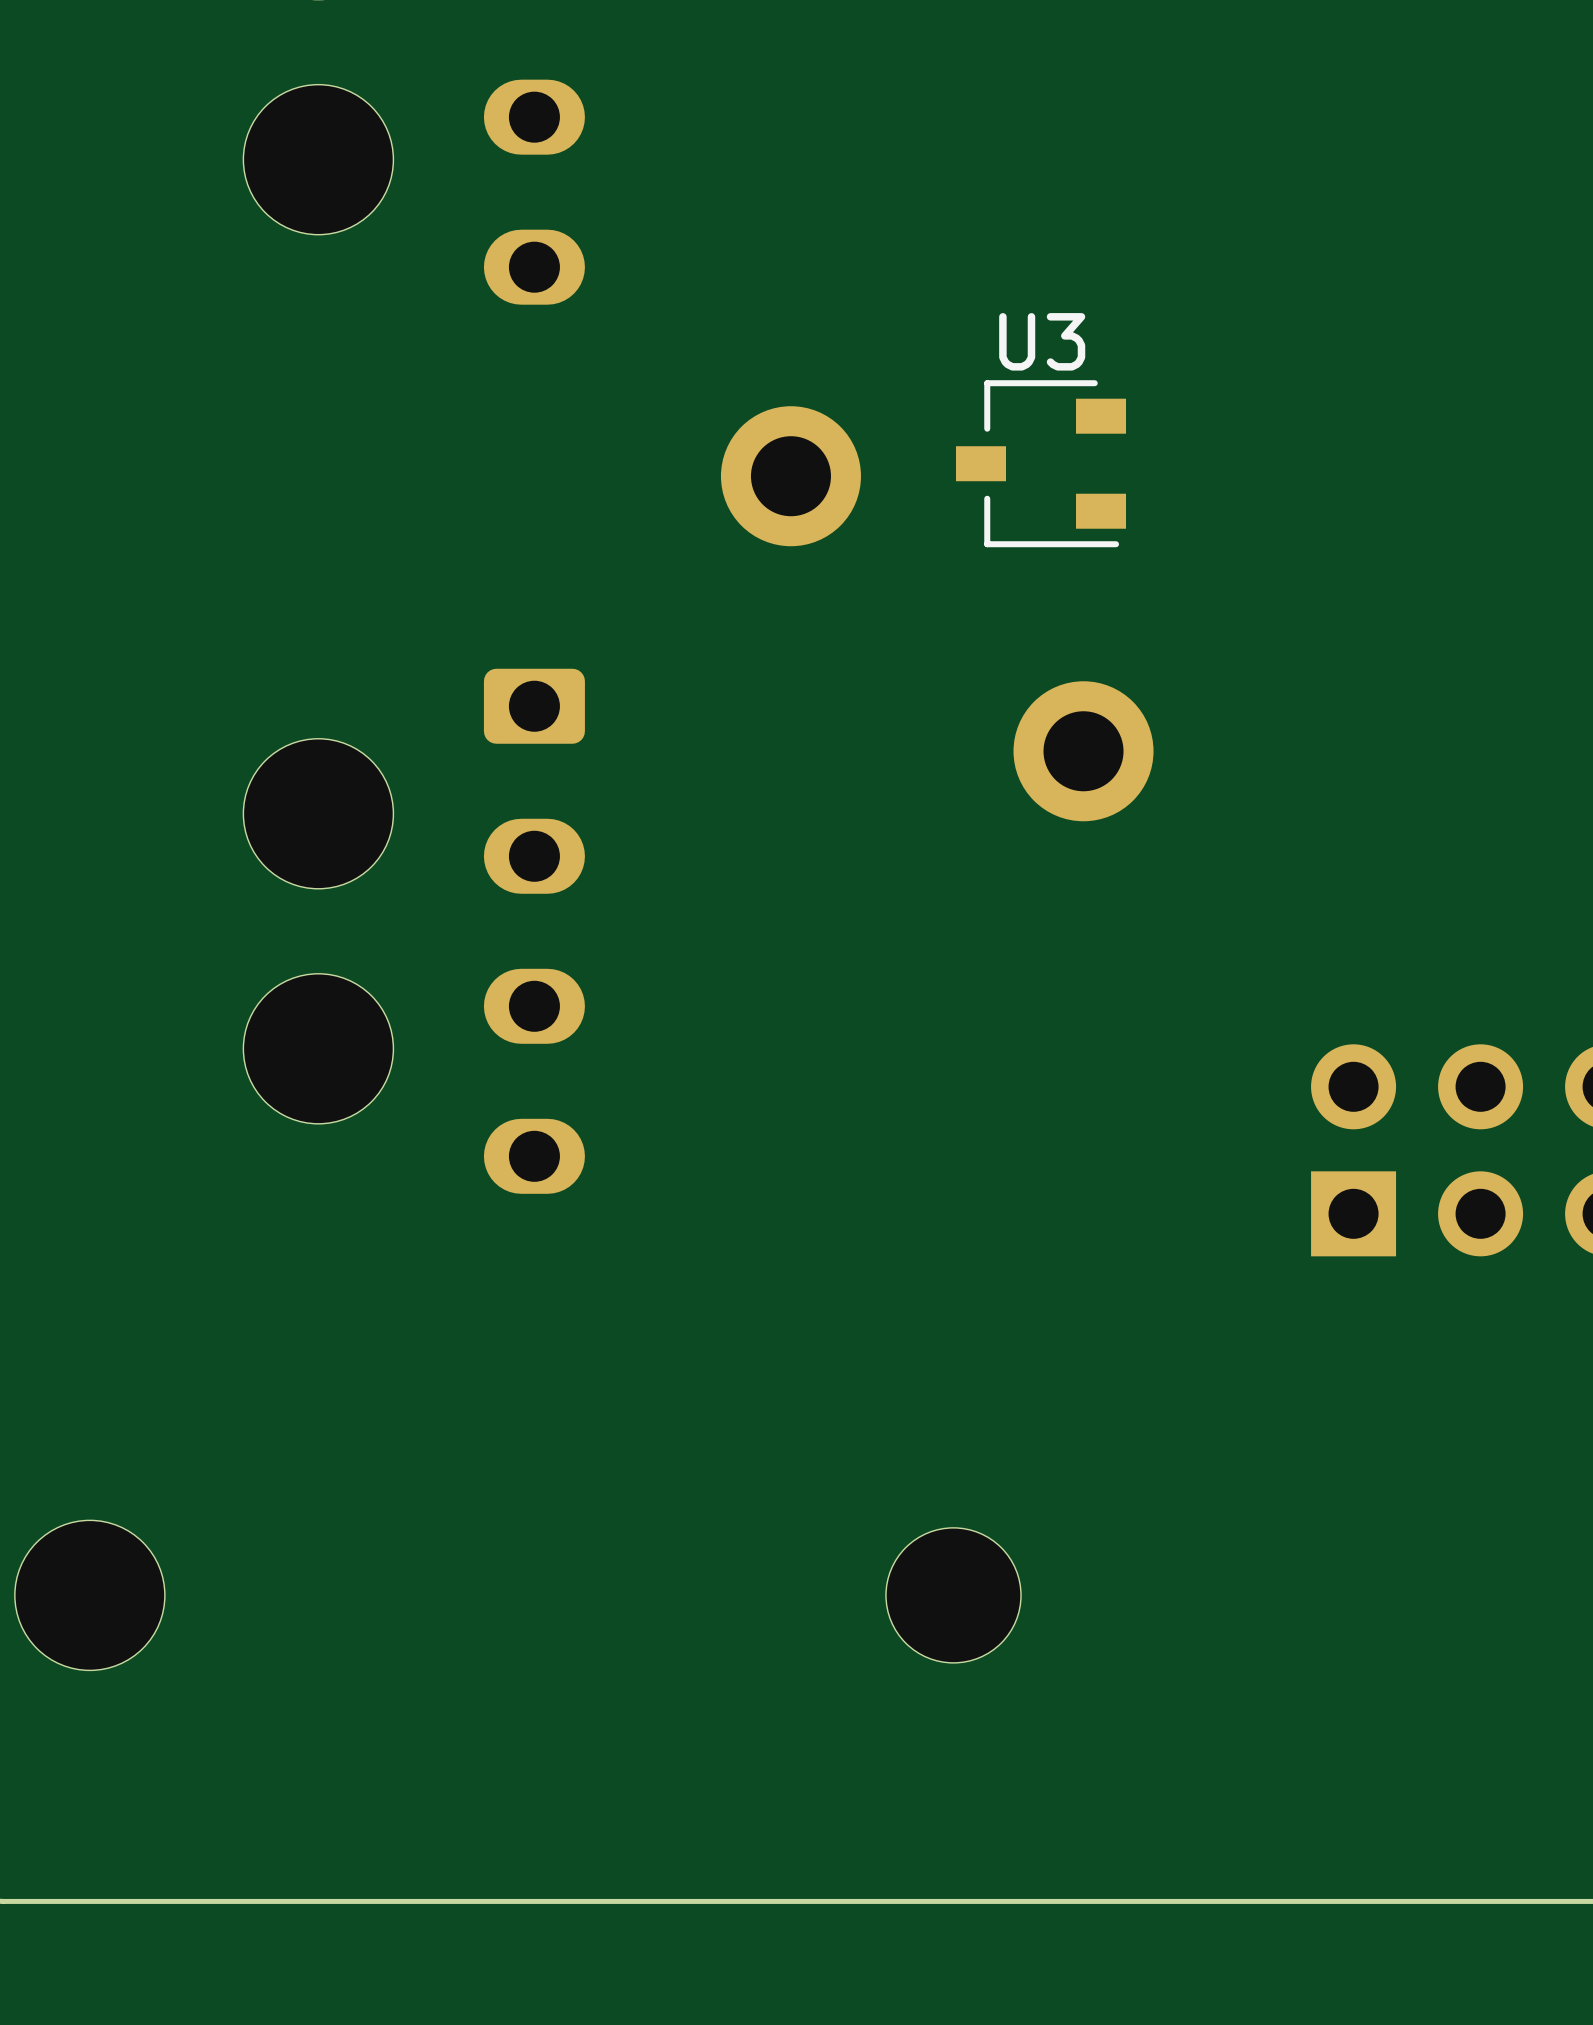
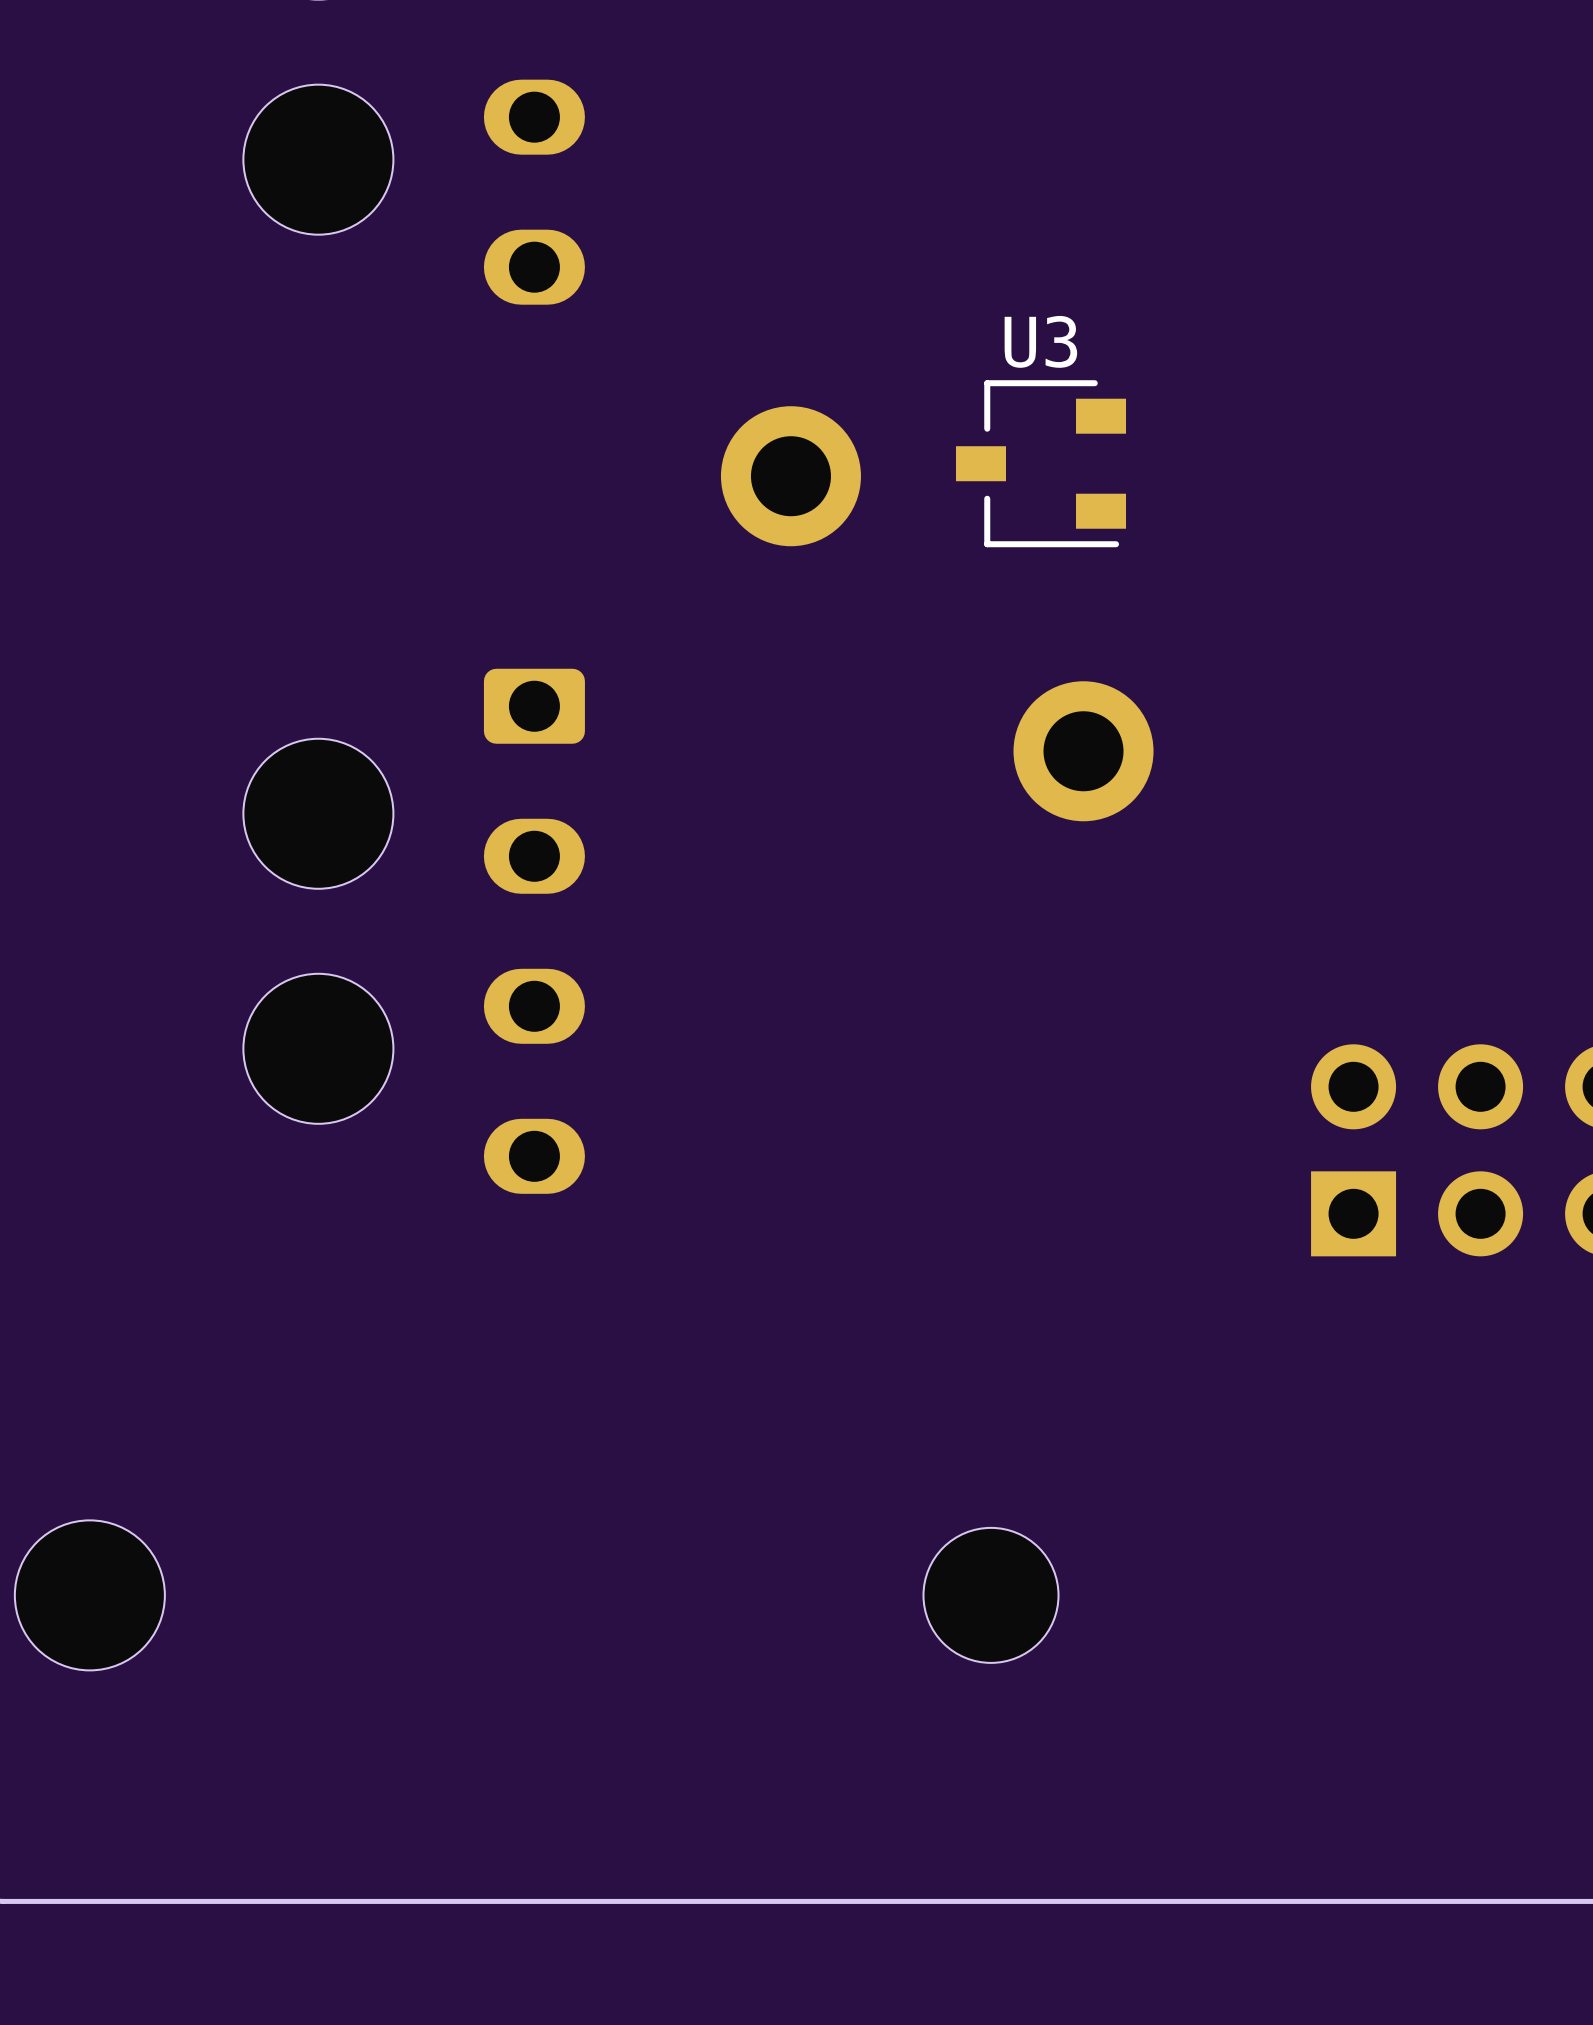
part position: (953, 1595) -> (991, 1595)

